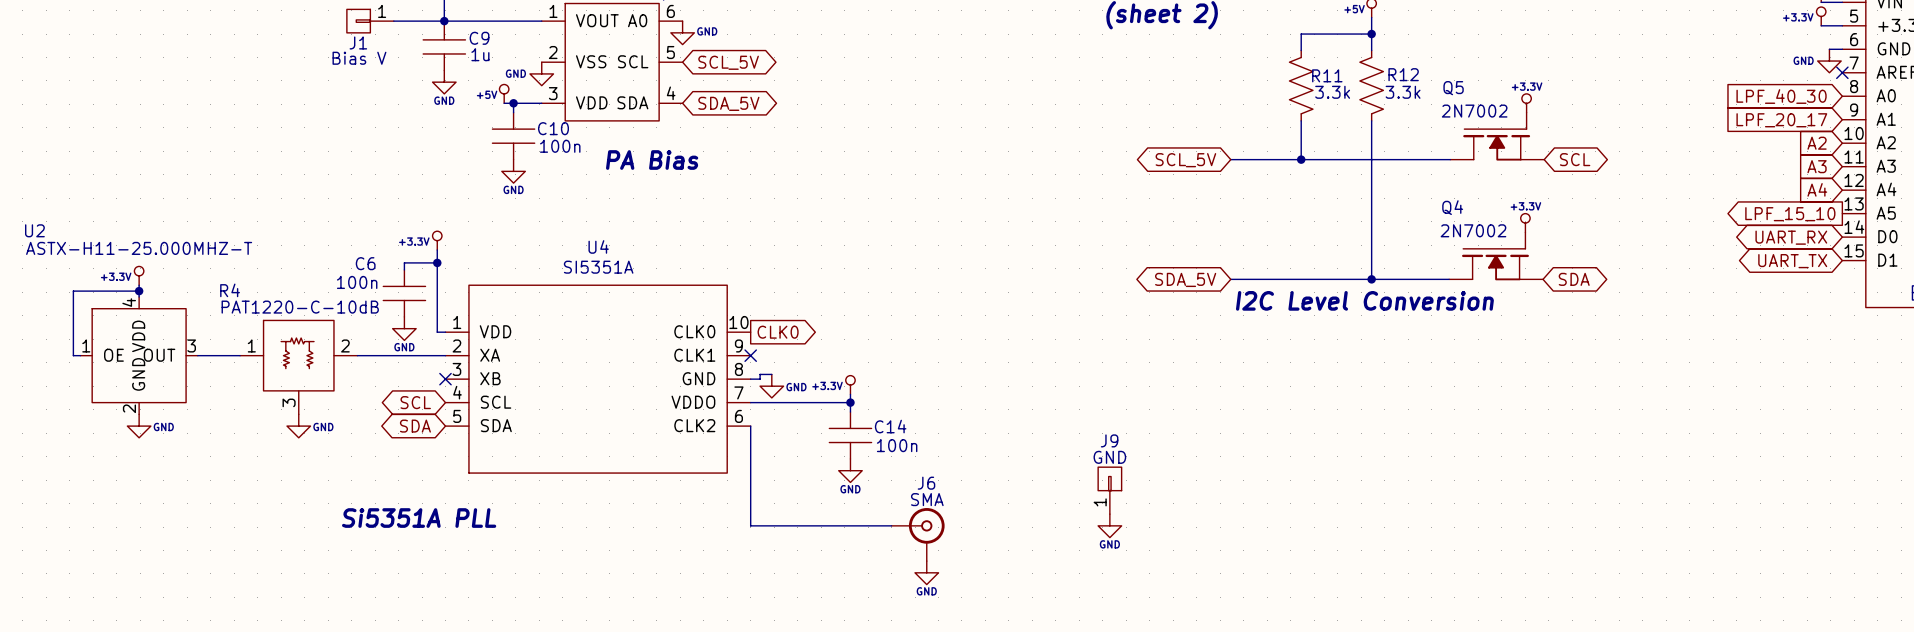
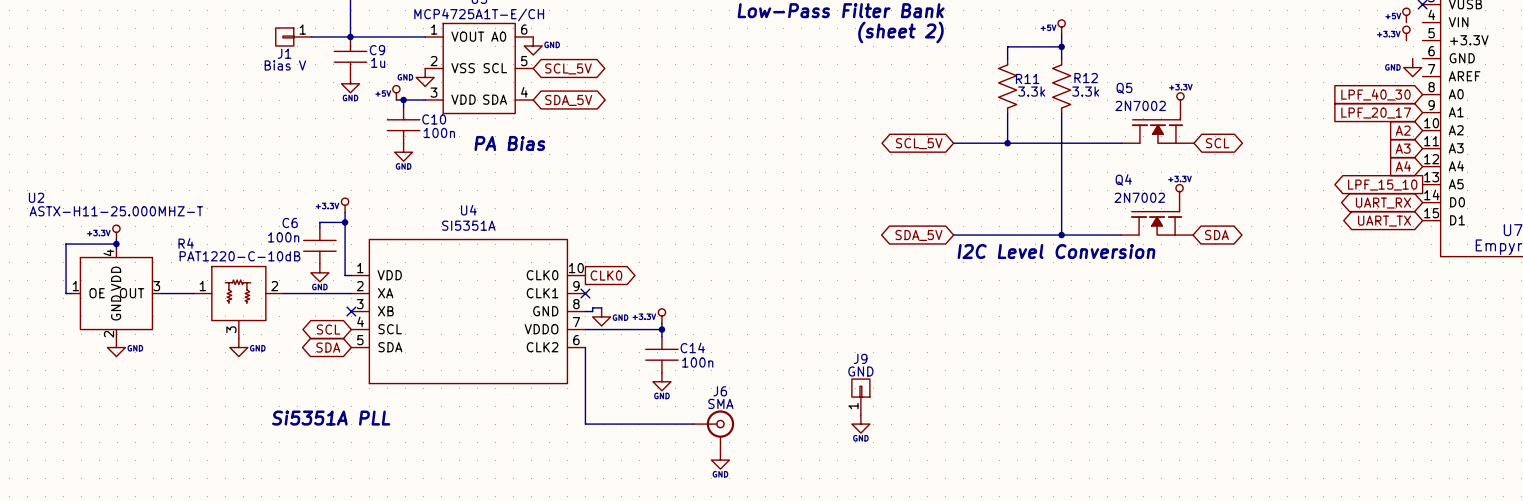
wire: (1821, 2) (1842, 2) -> none
wire: (1821, 25) (1842, 25) -> none
wire: (1829, 49) (1842, 49) -> none
no-connect mark: (1842, 72) -> none

